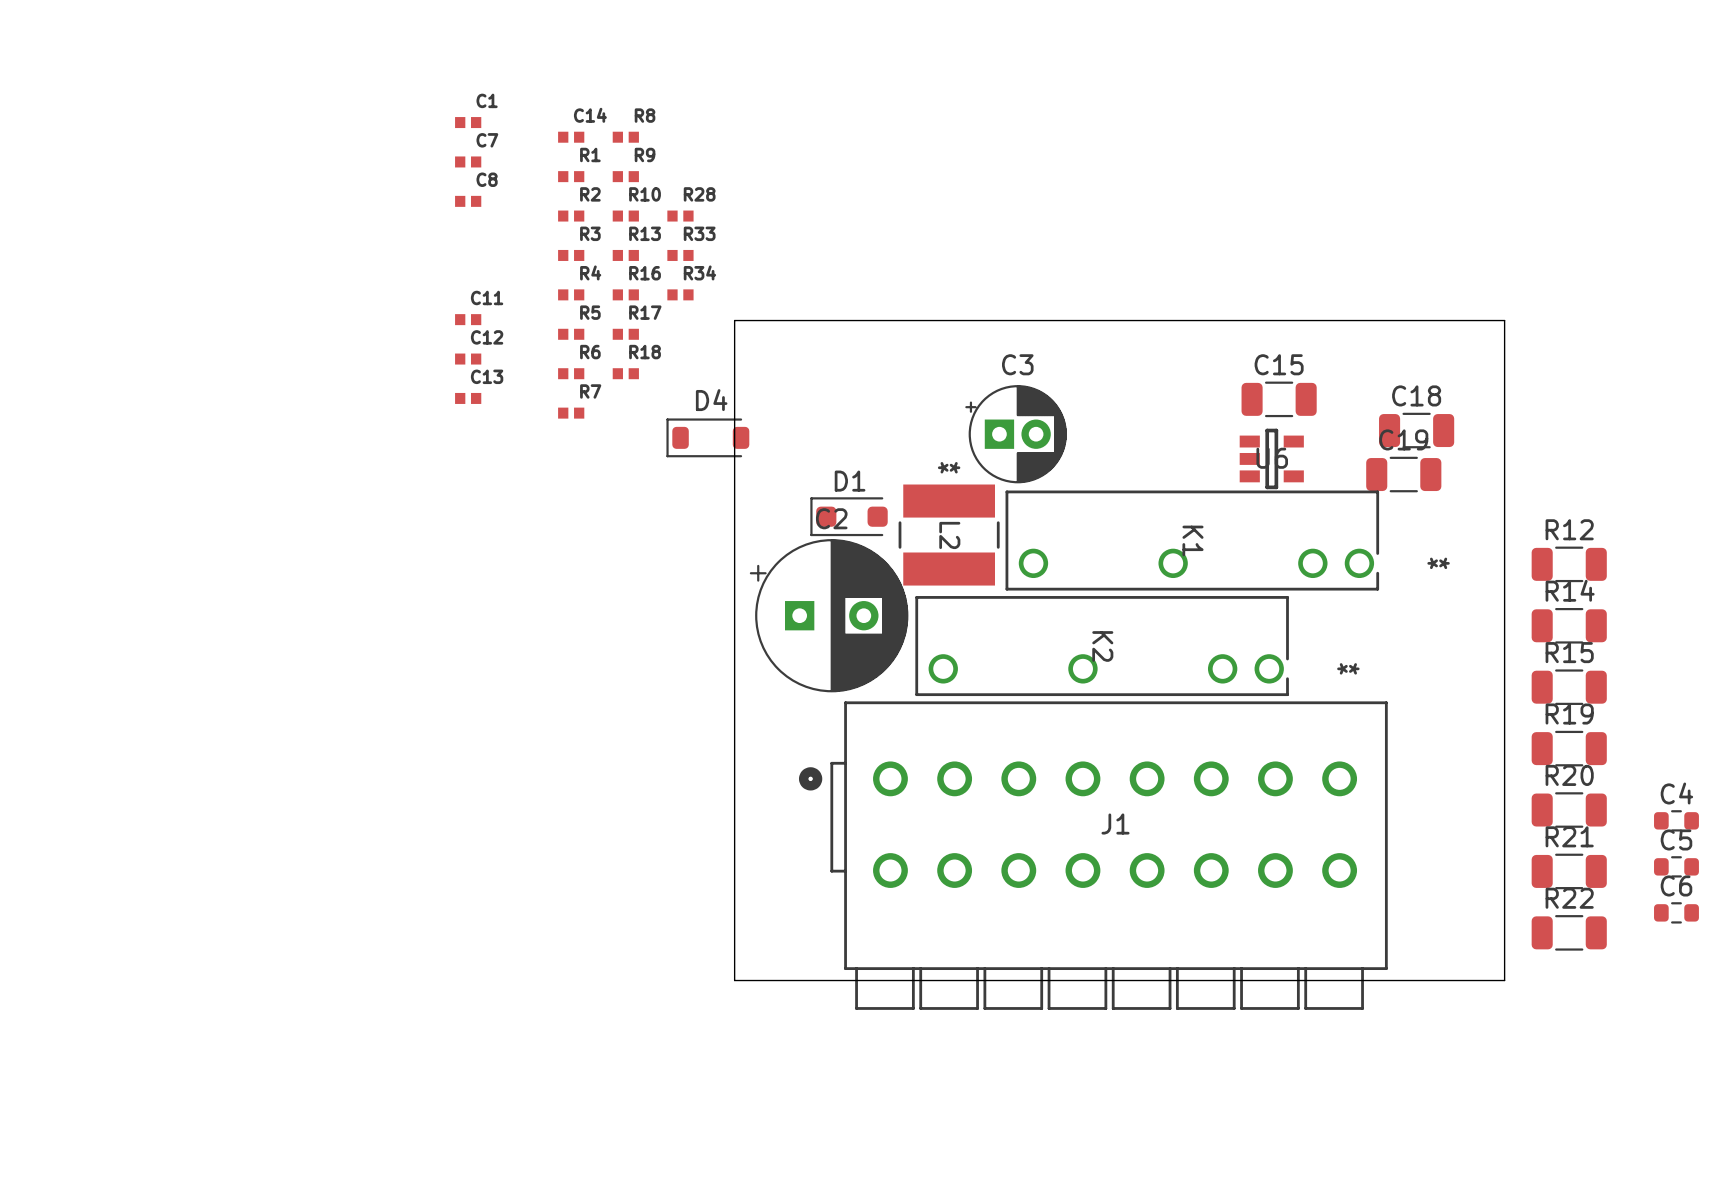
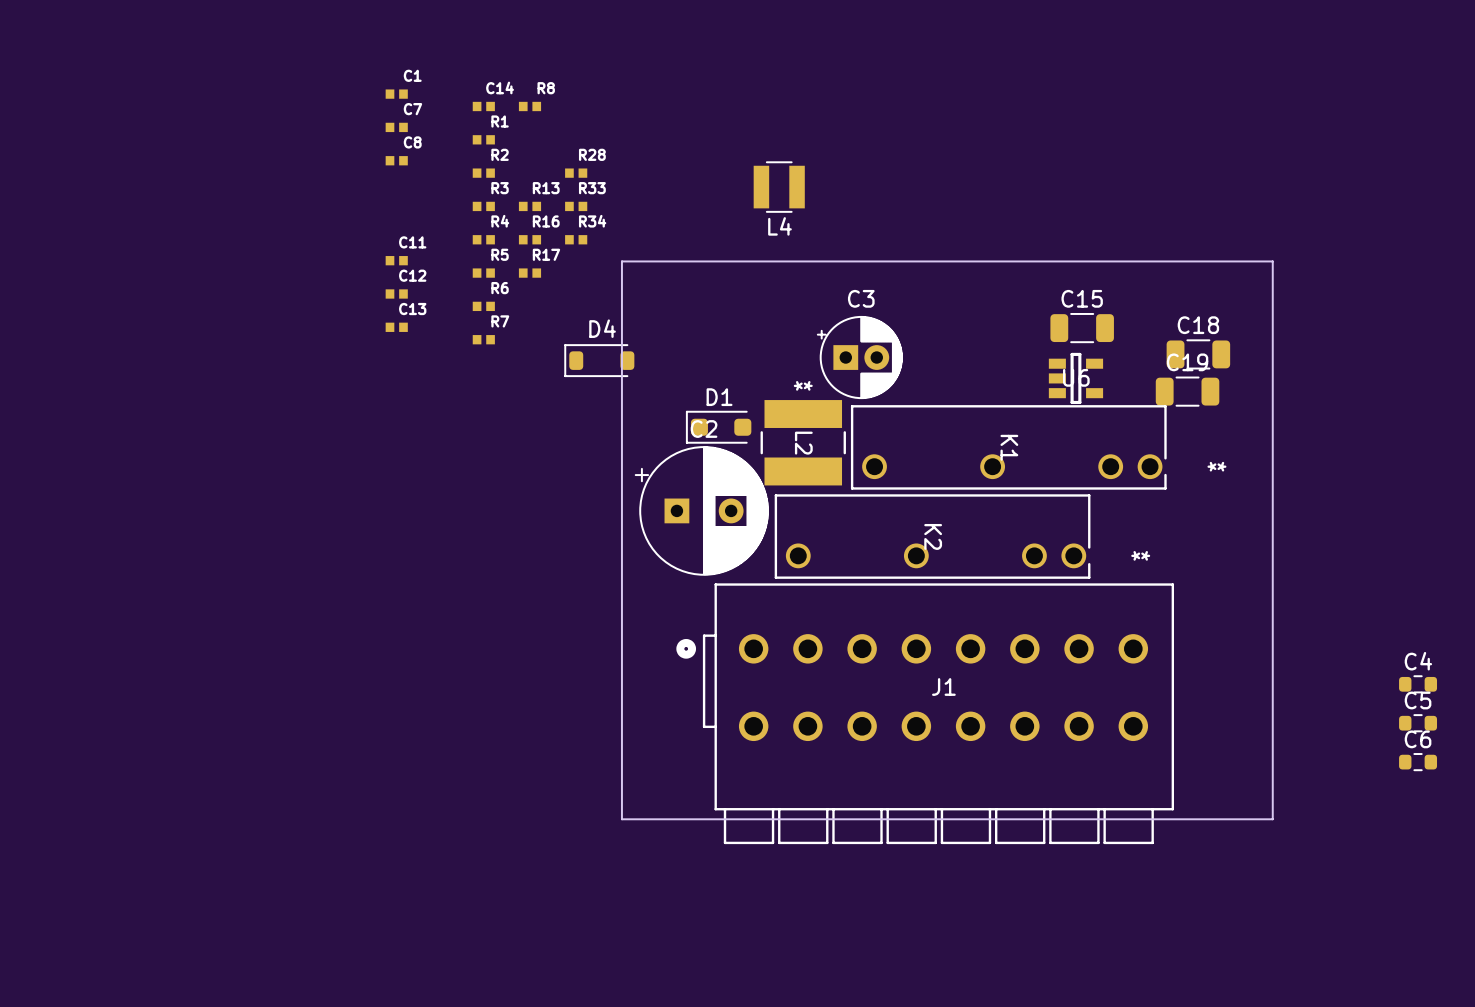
R9: (625, 176) -> none
R10: (625, 216) -> none
L4: none -> (779, 187)
R18: (625, 373) -> none
R12: (1569, 564) -> none
R14: (1569, 625) -> none
R15: (1569, 687) -> none
R19: (1569, 748) -> none
R20: (1569, 810) -> none
R21: (1569, 871) -> none
R22: (1569, 932) -> none

